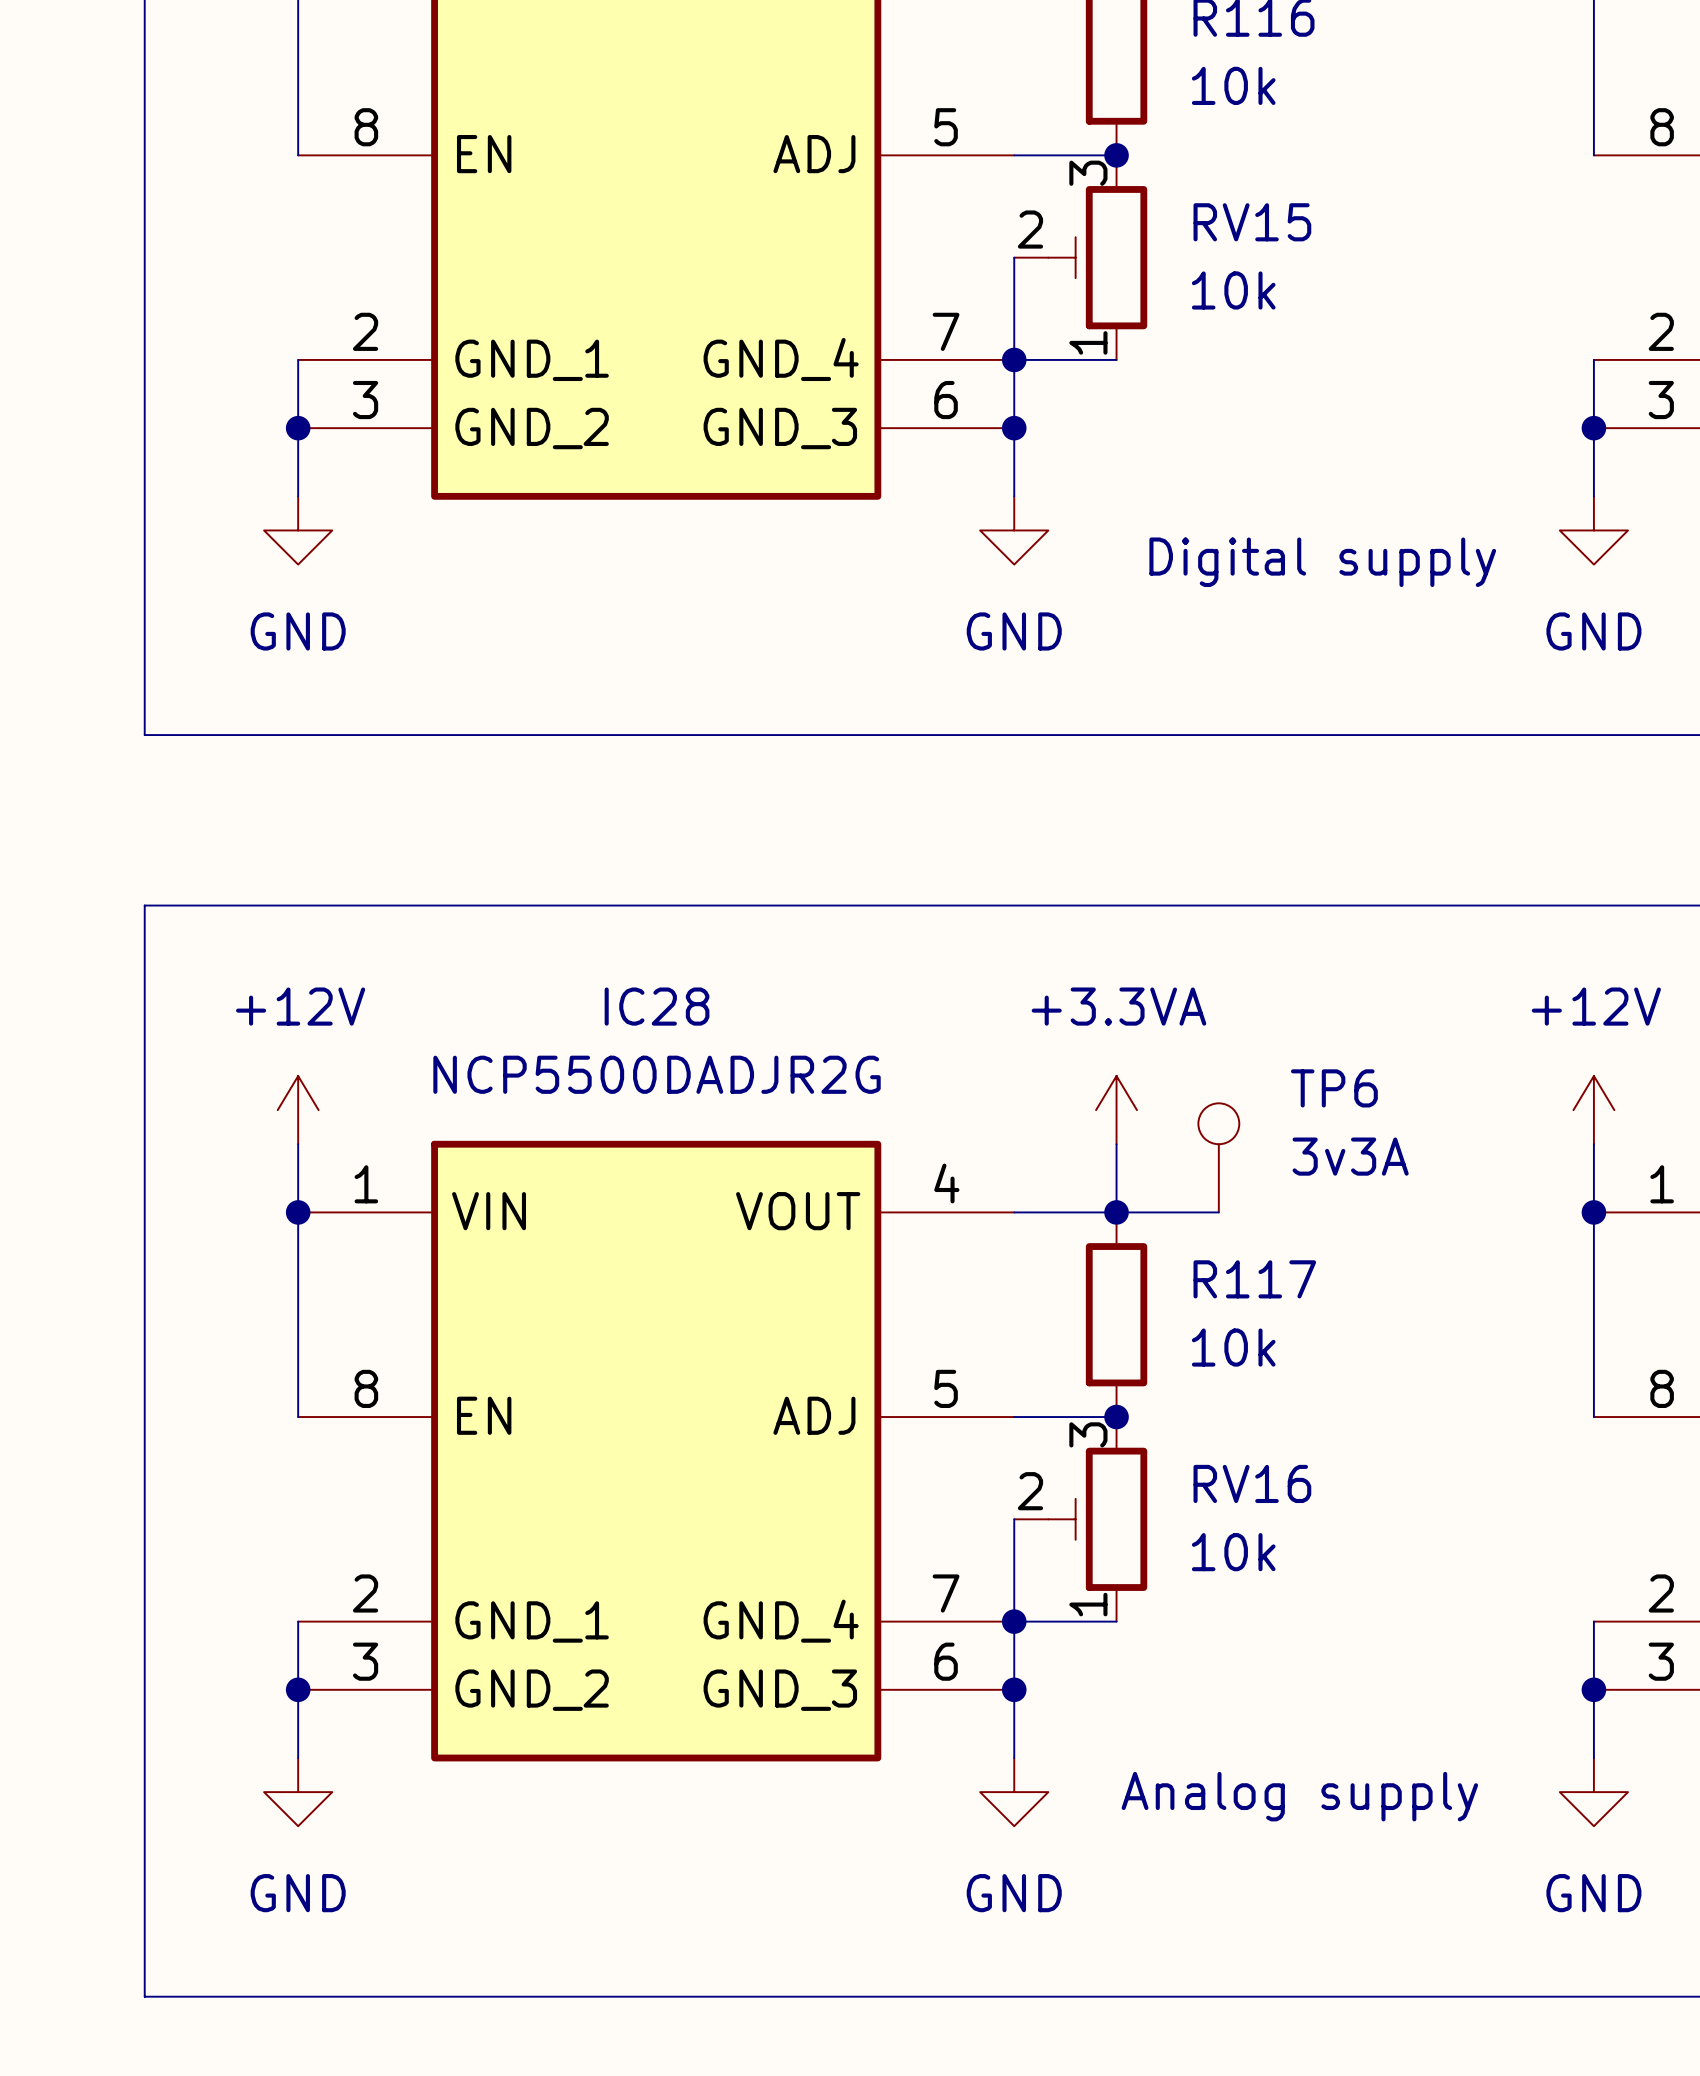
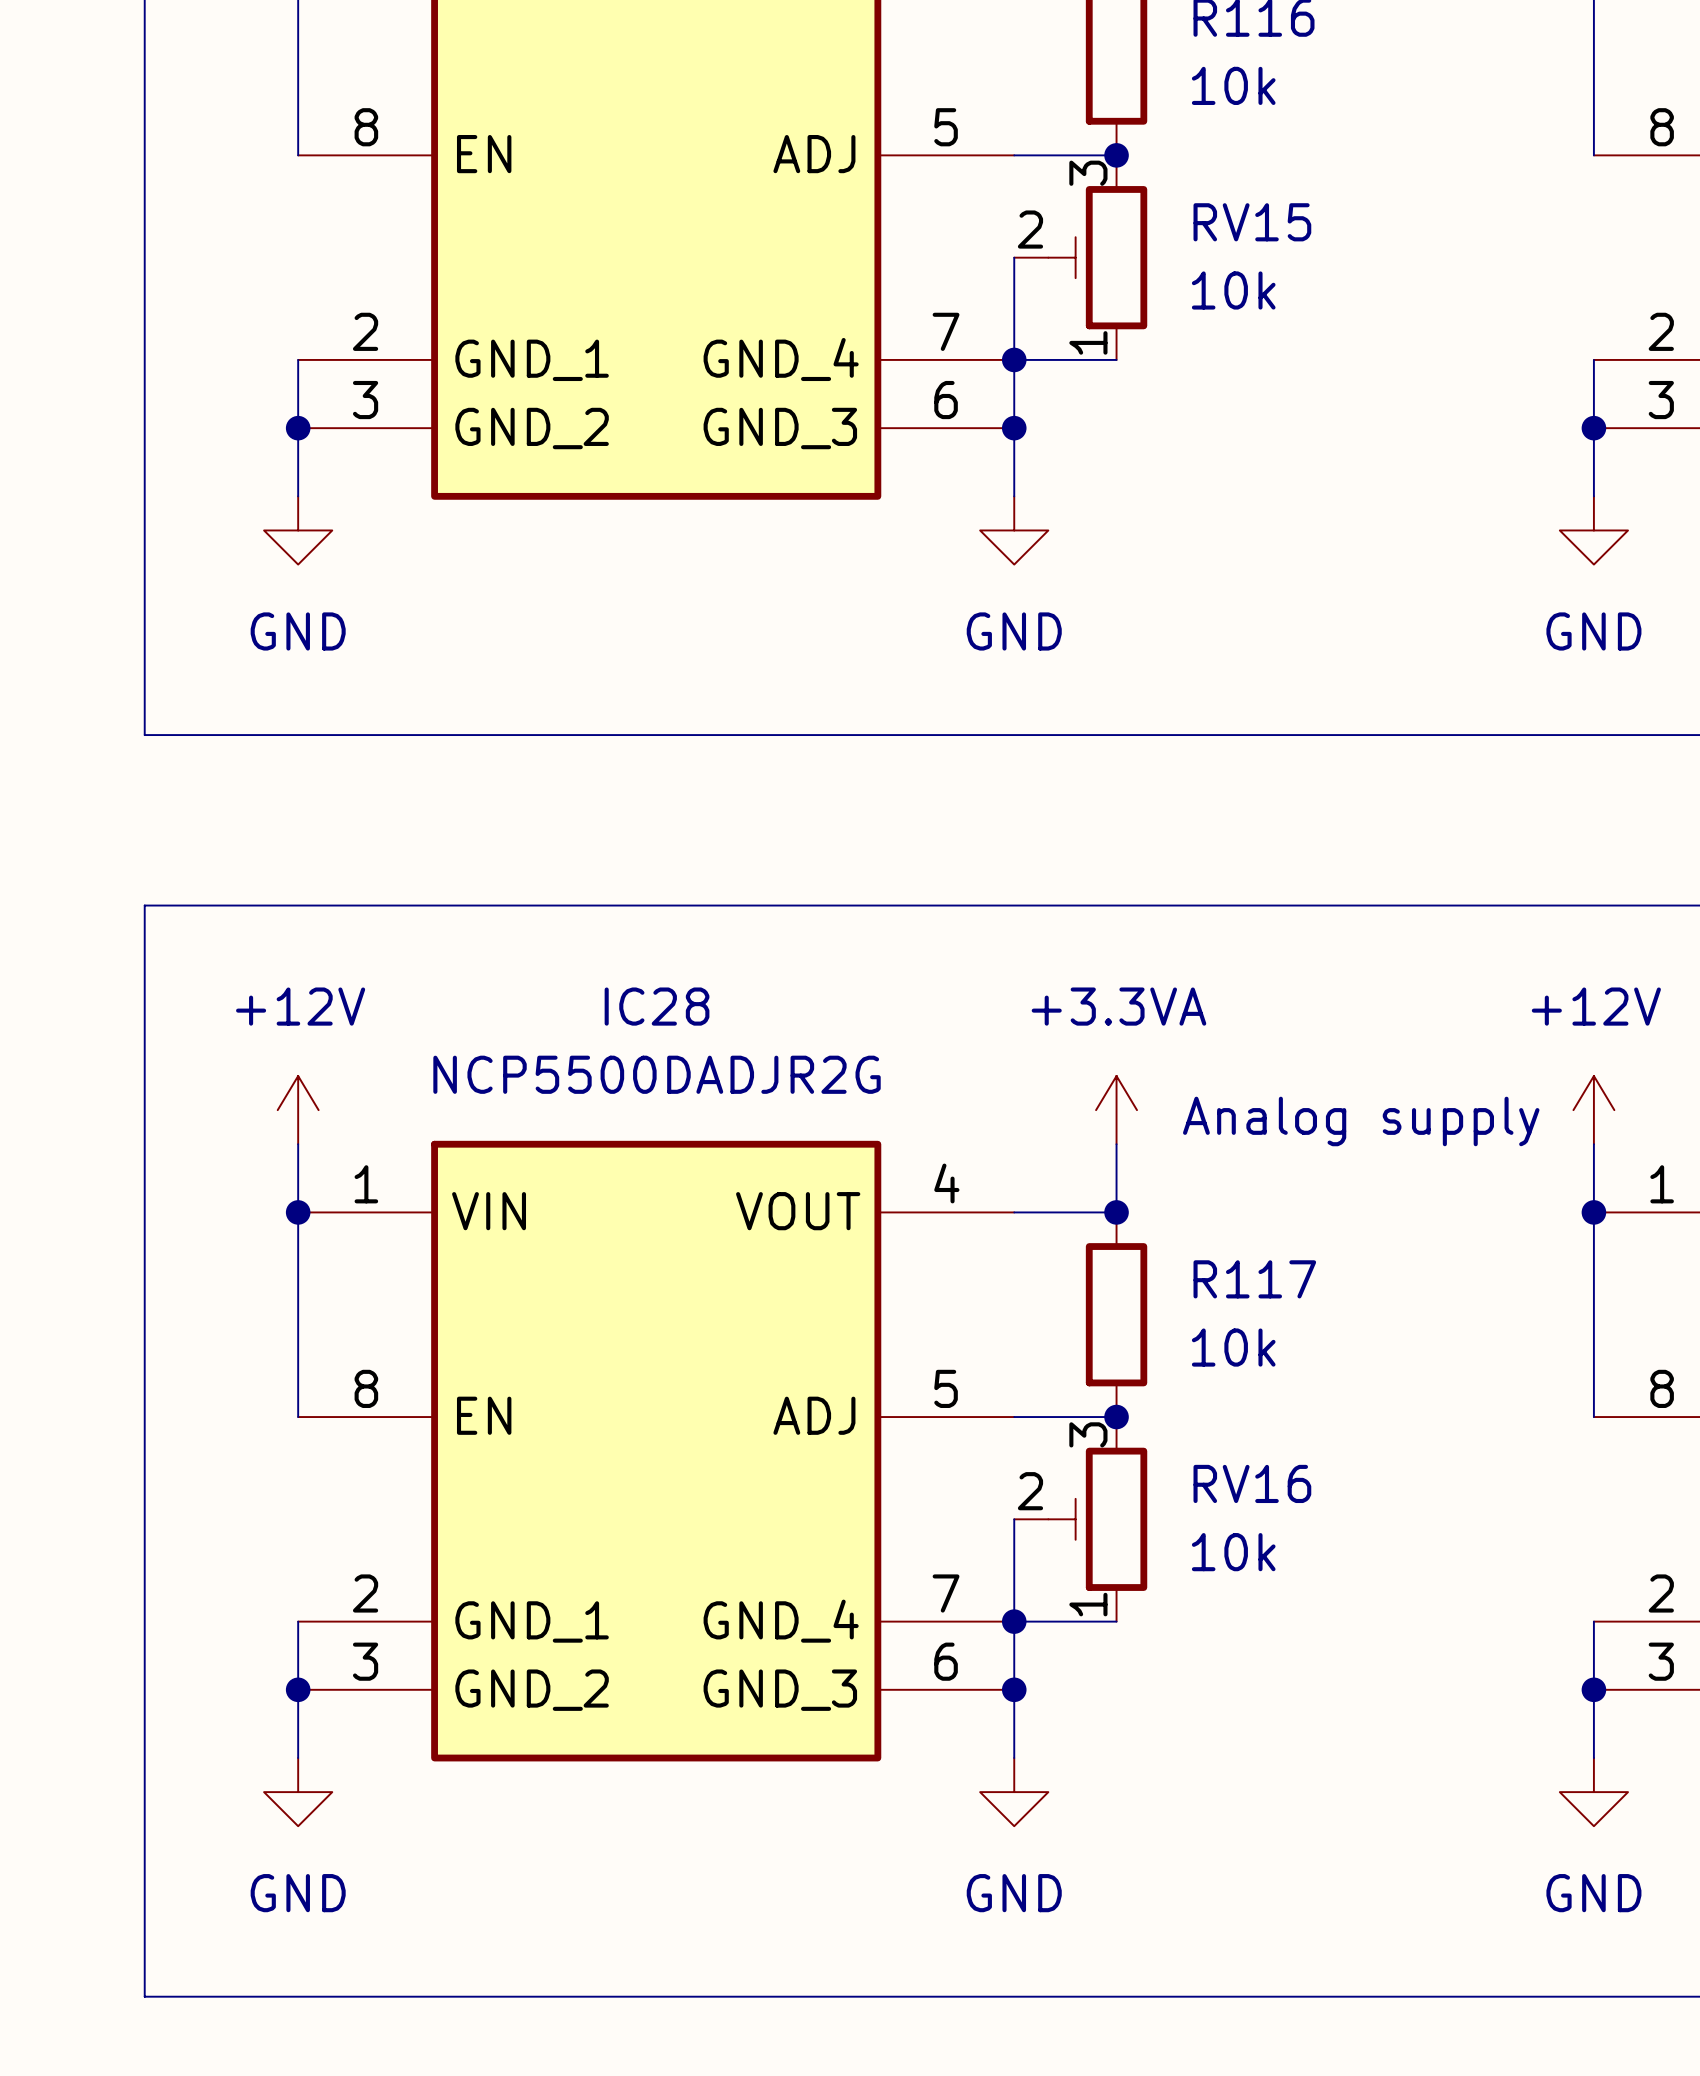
text: Digital supply (1322, 562) -> none
text: none -> Analog supply (1361, 1121)
TP6: 3v3A (1218, 1157) -> none
wire: (1116, 1212) (1218, 1212) -> none
text: Analog supply (1299, 1796) -> none

